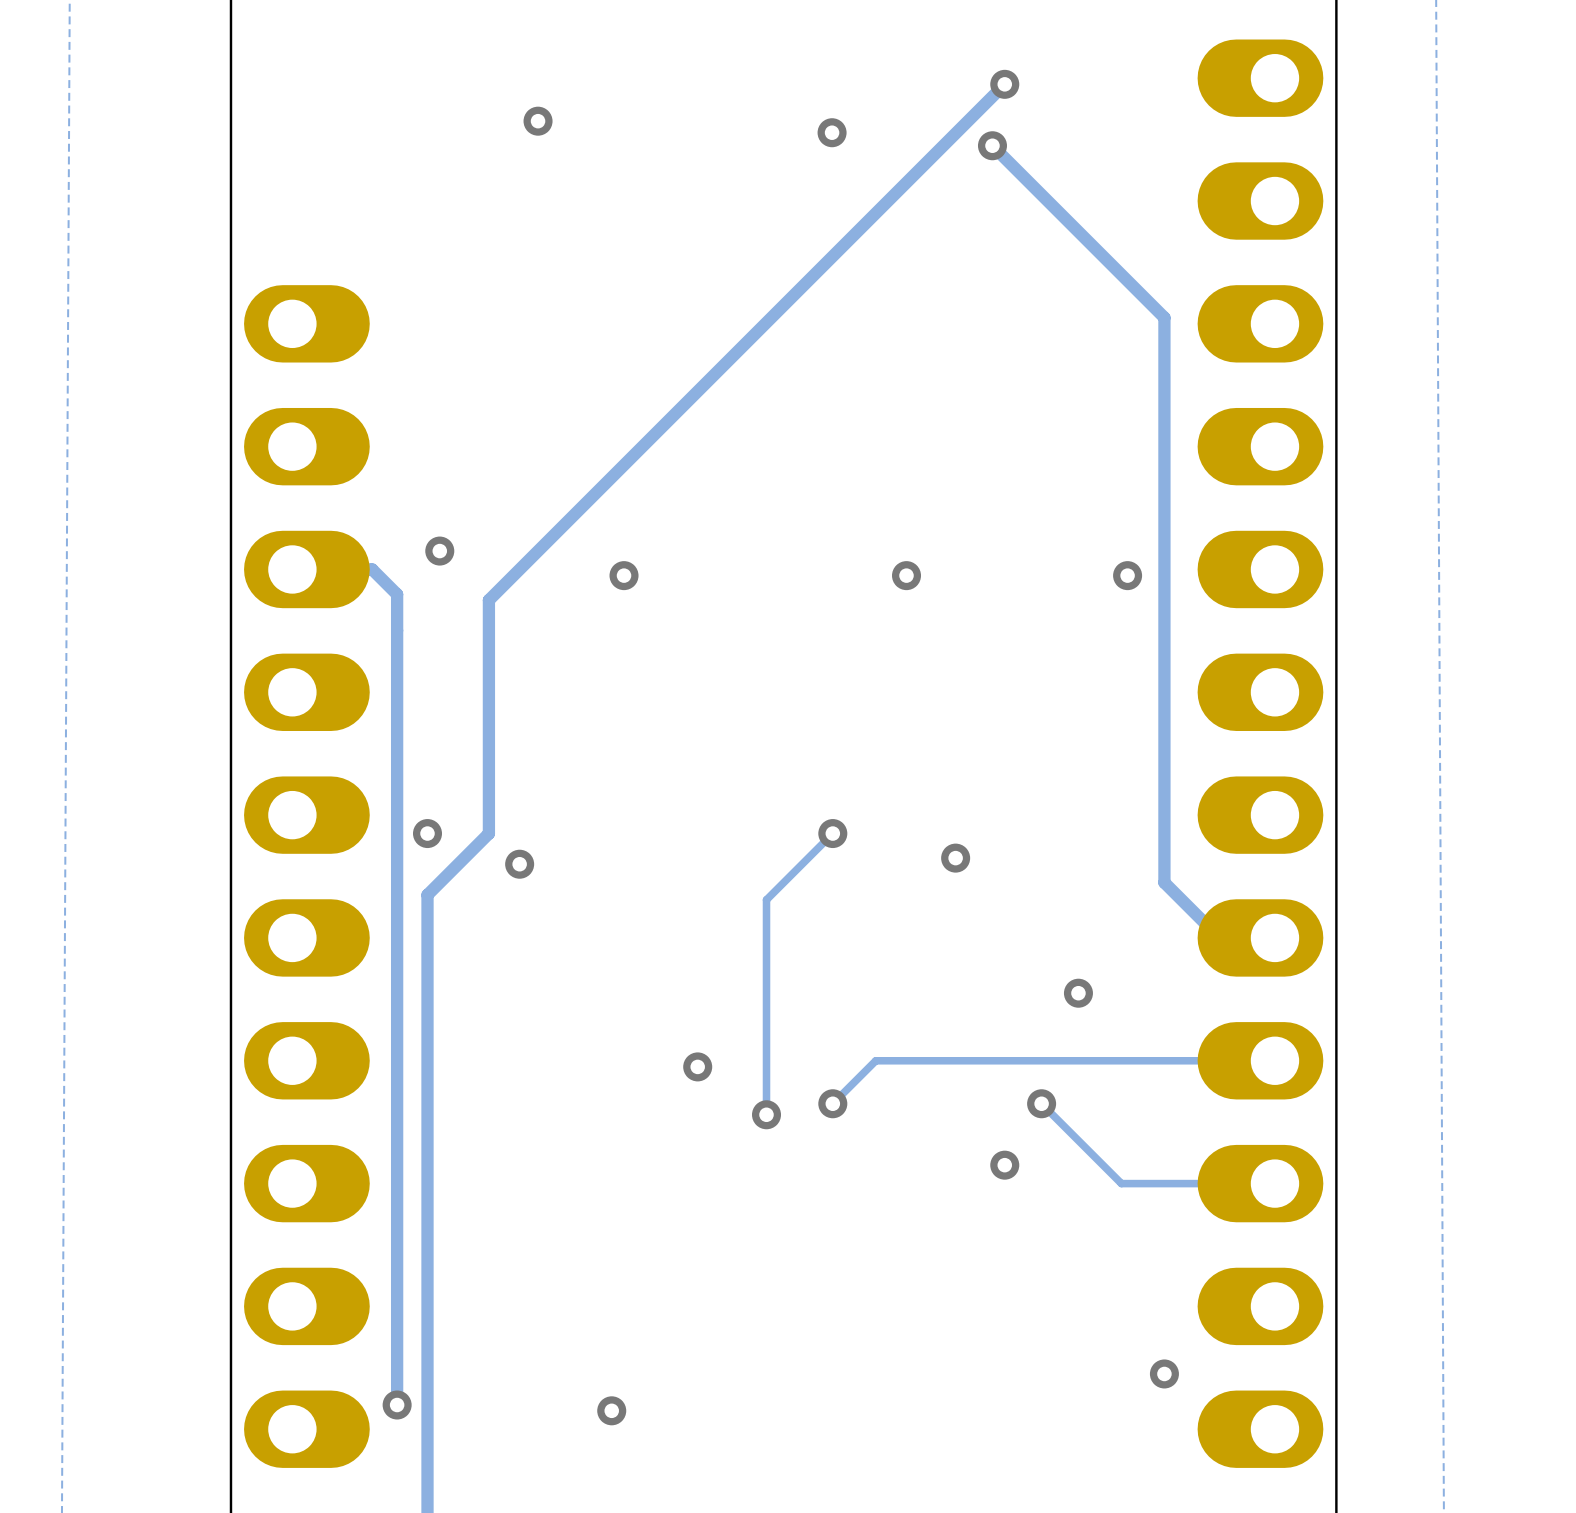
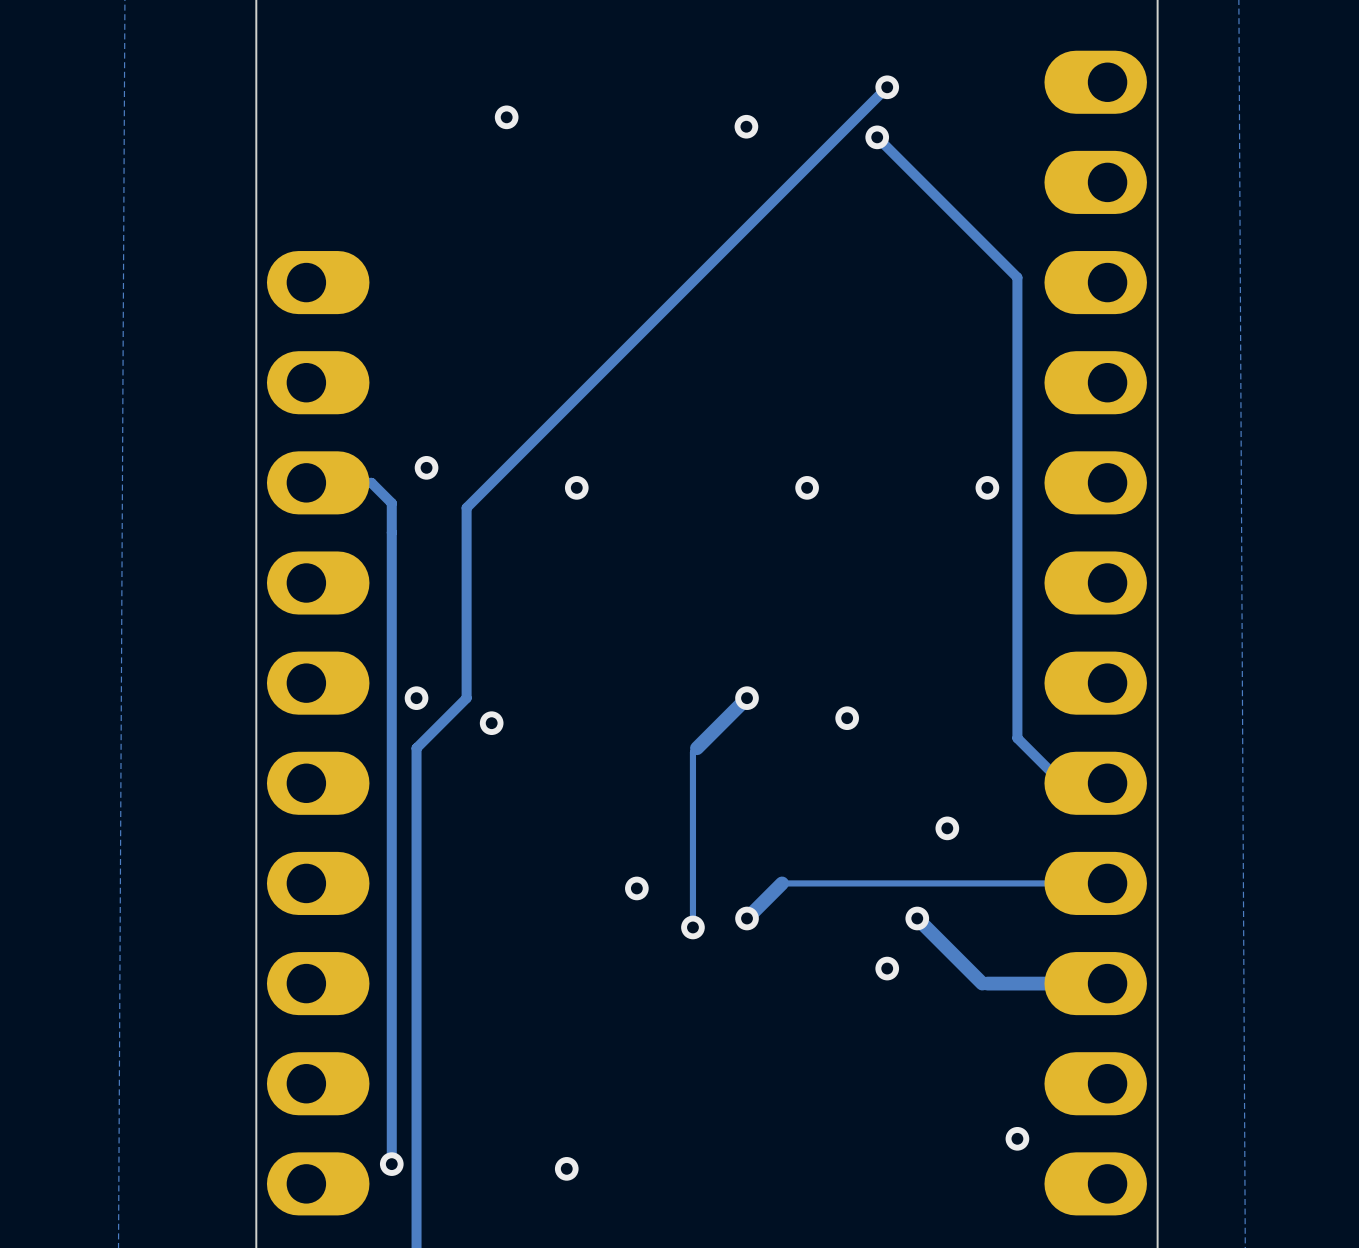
track width: thin (832, 833) (771, 894) -> thick (747, 698) (696, 748)
track width: thin (875, 1060) (832, 1103) -> thick (782, 883) (747, 918)
track width: thin (1041, 1103) (1121, 1183) -> thick (917, 918) (982, 983)
track width: thin (1274, 1183) (1127, 1183) -> thick (1107, 983) (987, 983)

